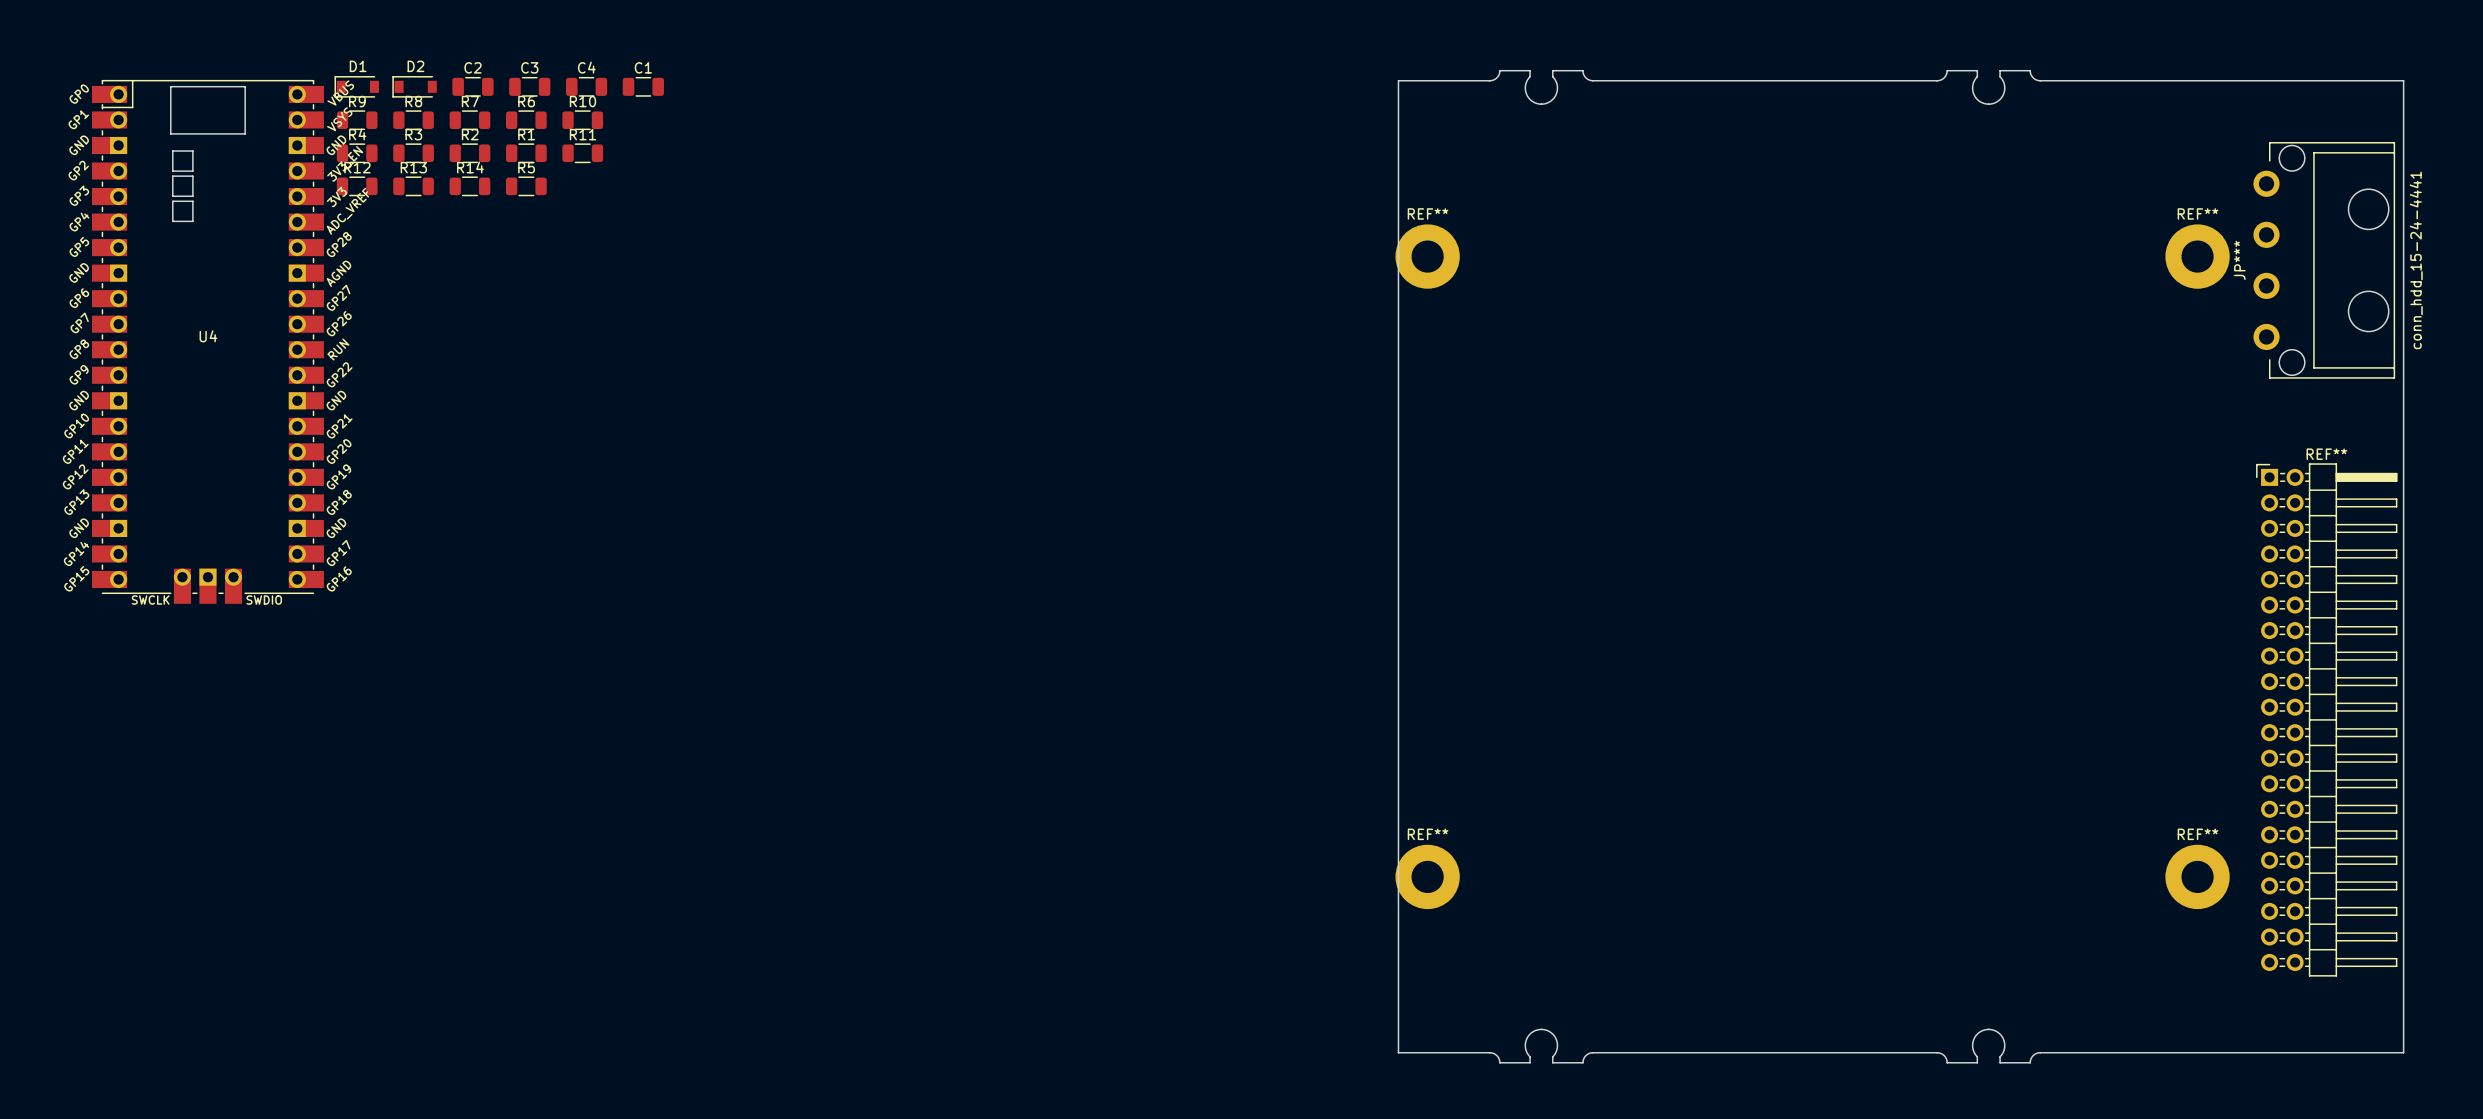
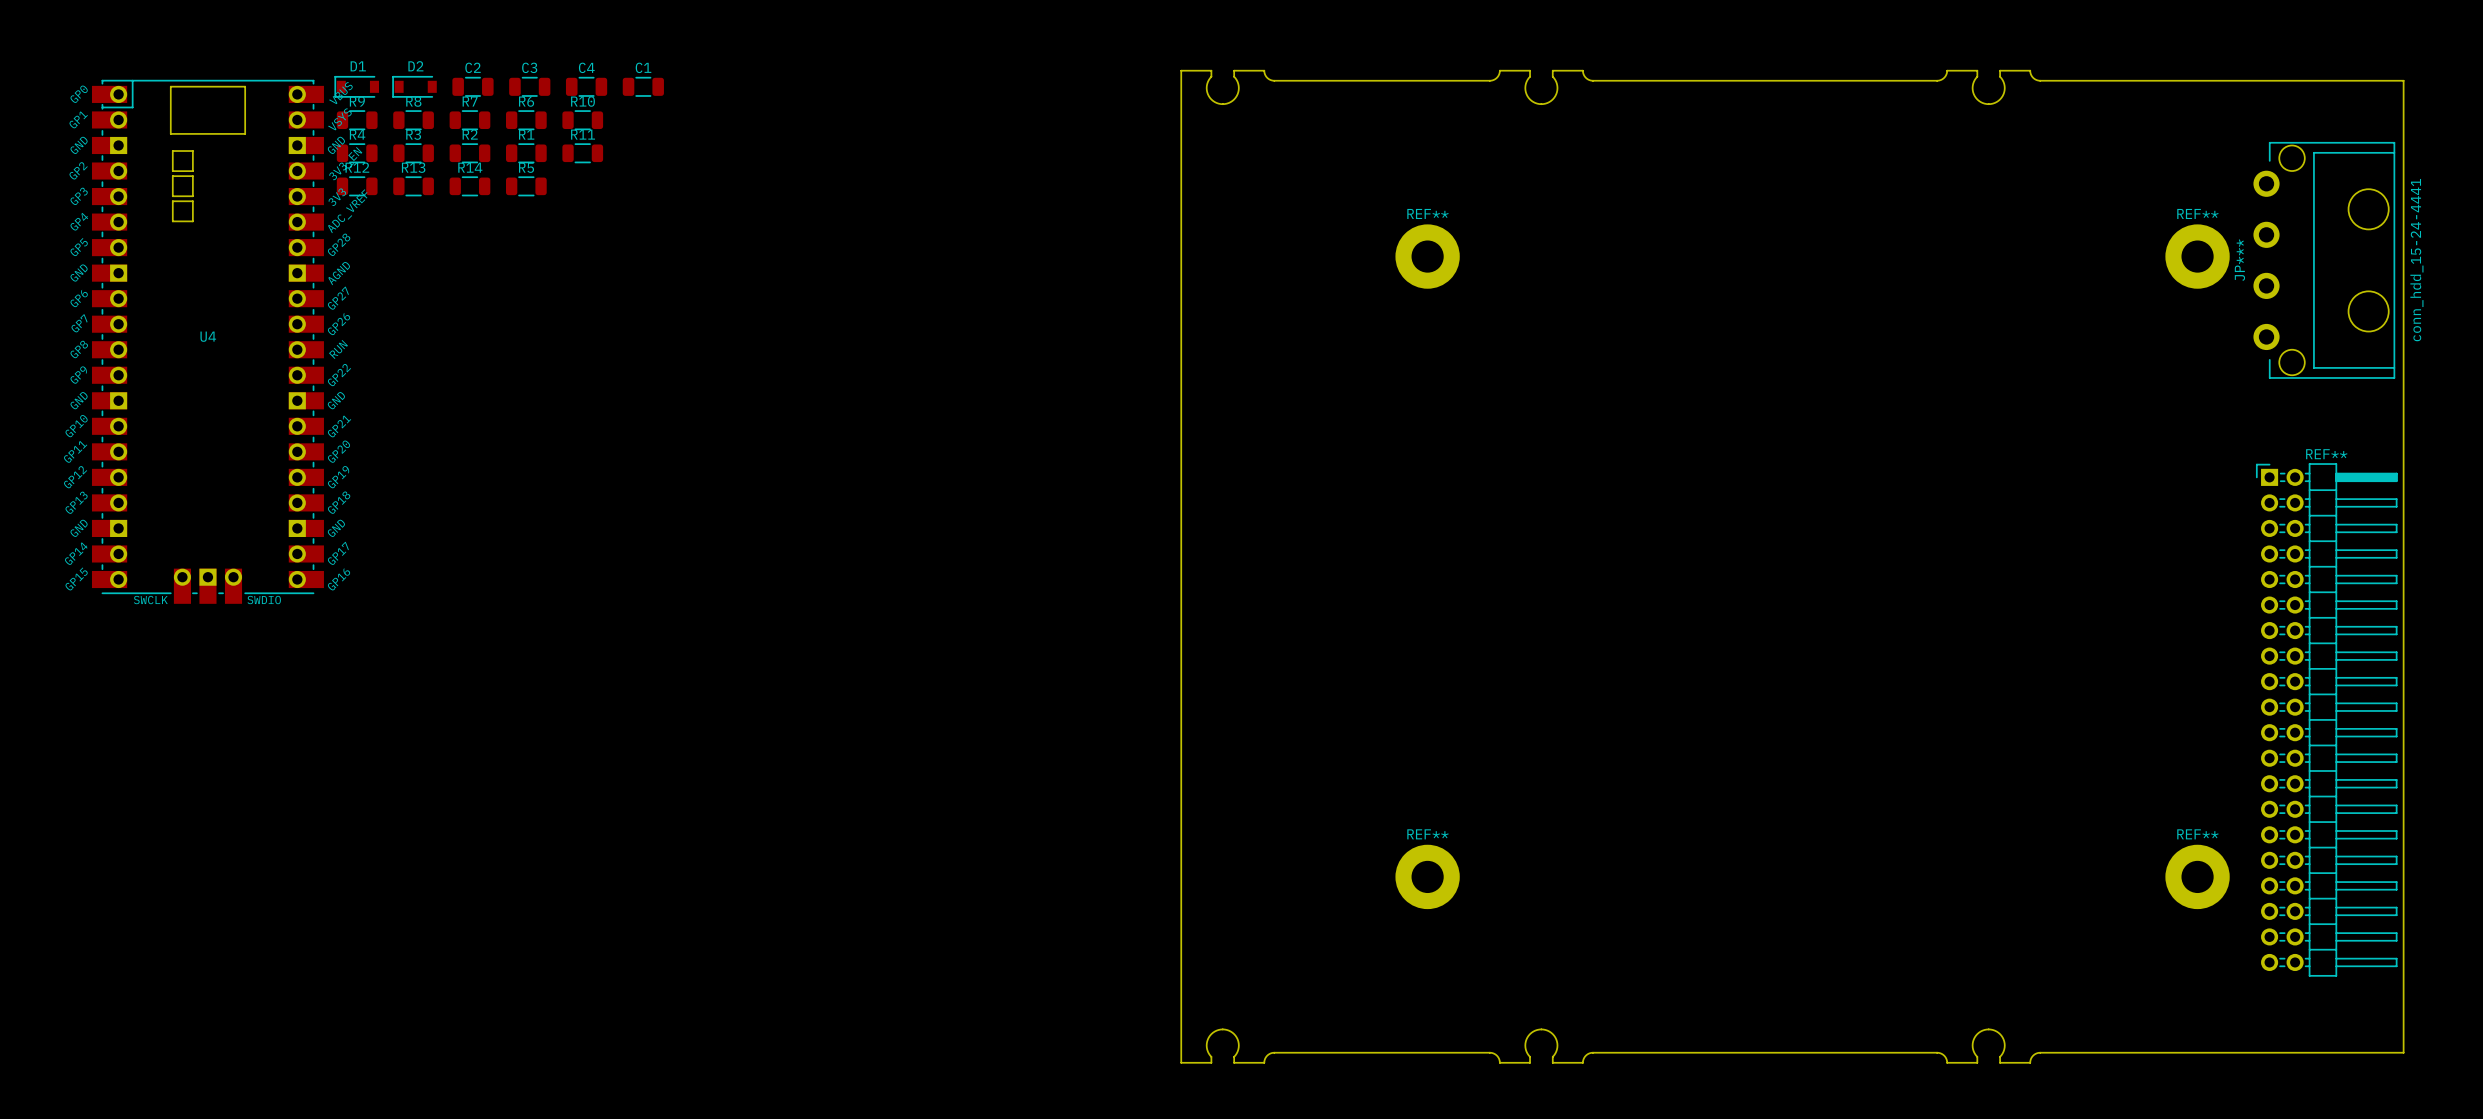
board edge: (1398, 80) (1398, 1052) -> (1398, 80) (1274, 80) (1267, 77) (1264, 70) (1234, 70) (1234, 76) (1238, 85) (1237, 94) (1230, 102) (1222, 104) (1214, 102) (1207, 94) (1206, 85) (1211, 76) (1211, 70) (1181, 70) (1181, 1062) (1211, 1062) (1211, 1056) (1206, 1047) (1207, 1039) (1212, 1032) (1222, 1029) (1232, 1032) (1237, 1039) (1238, 1047) (1234, 1056) (1234, 1062) (1264, 1062) (1267, 1055) (1274, 1052) (1398, 1052)

